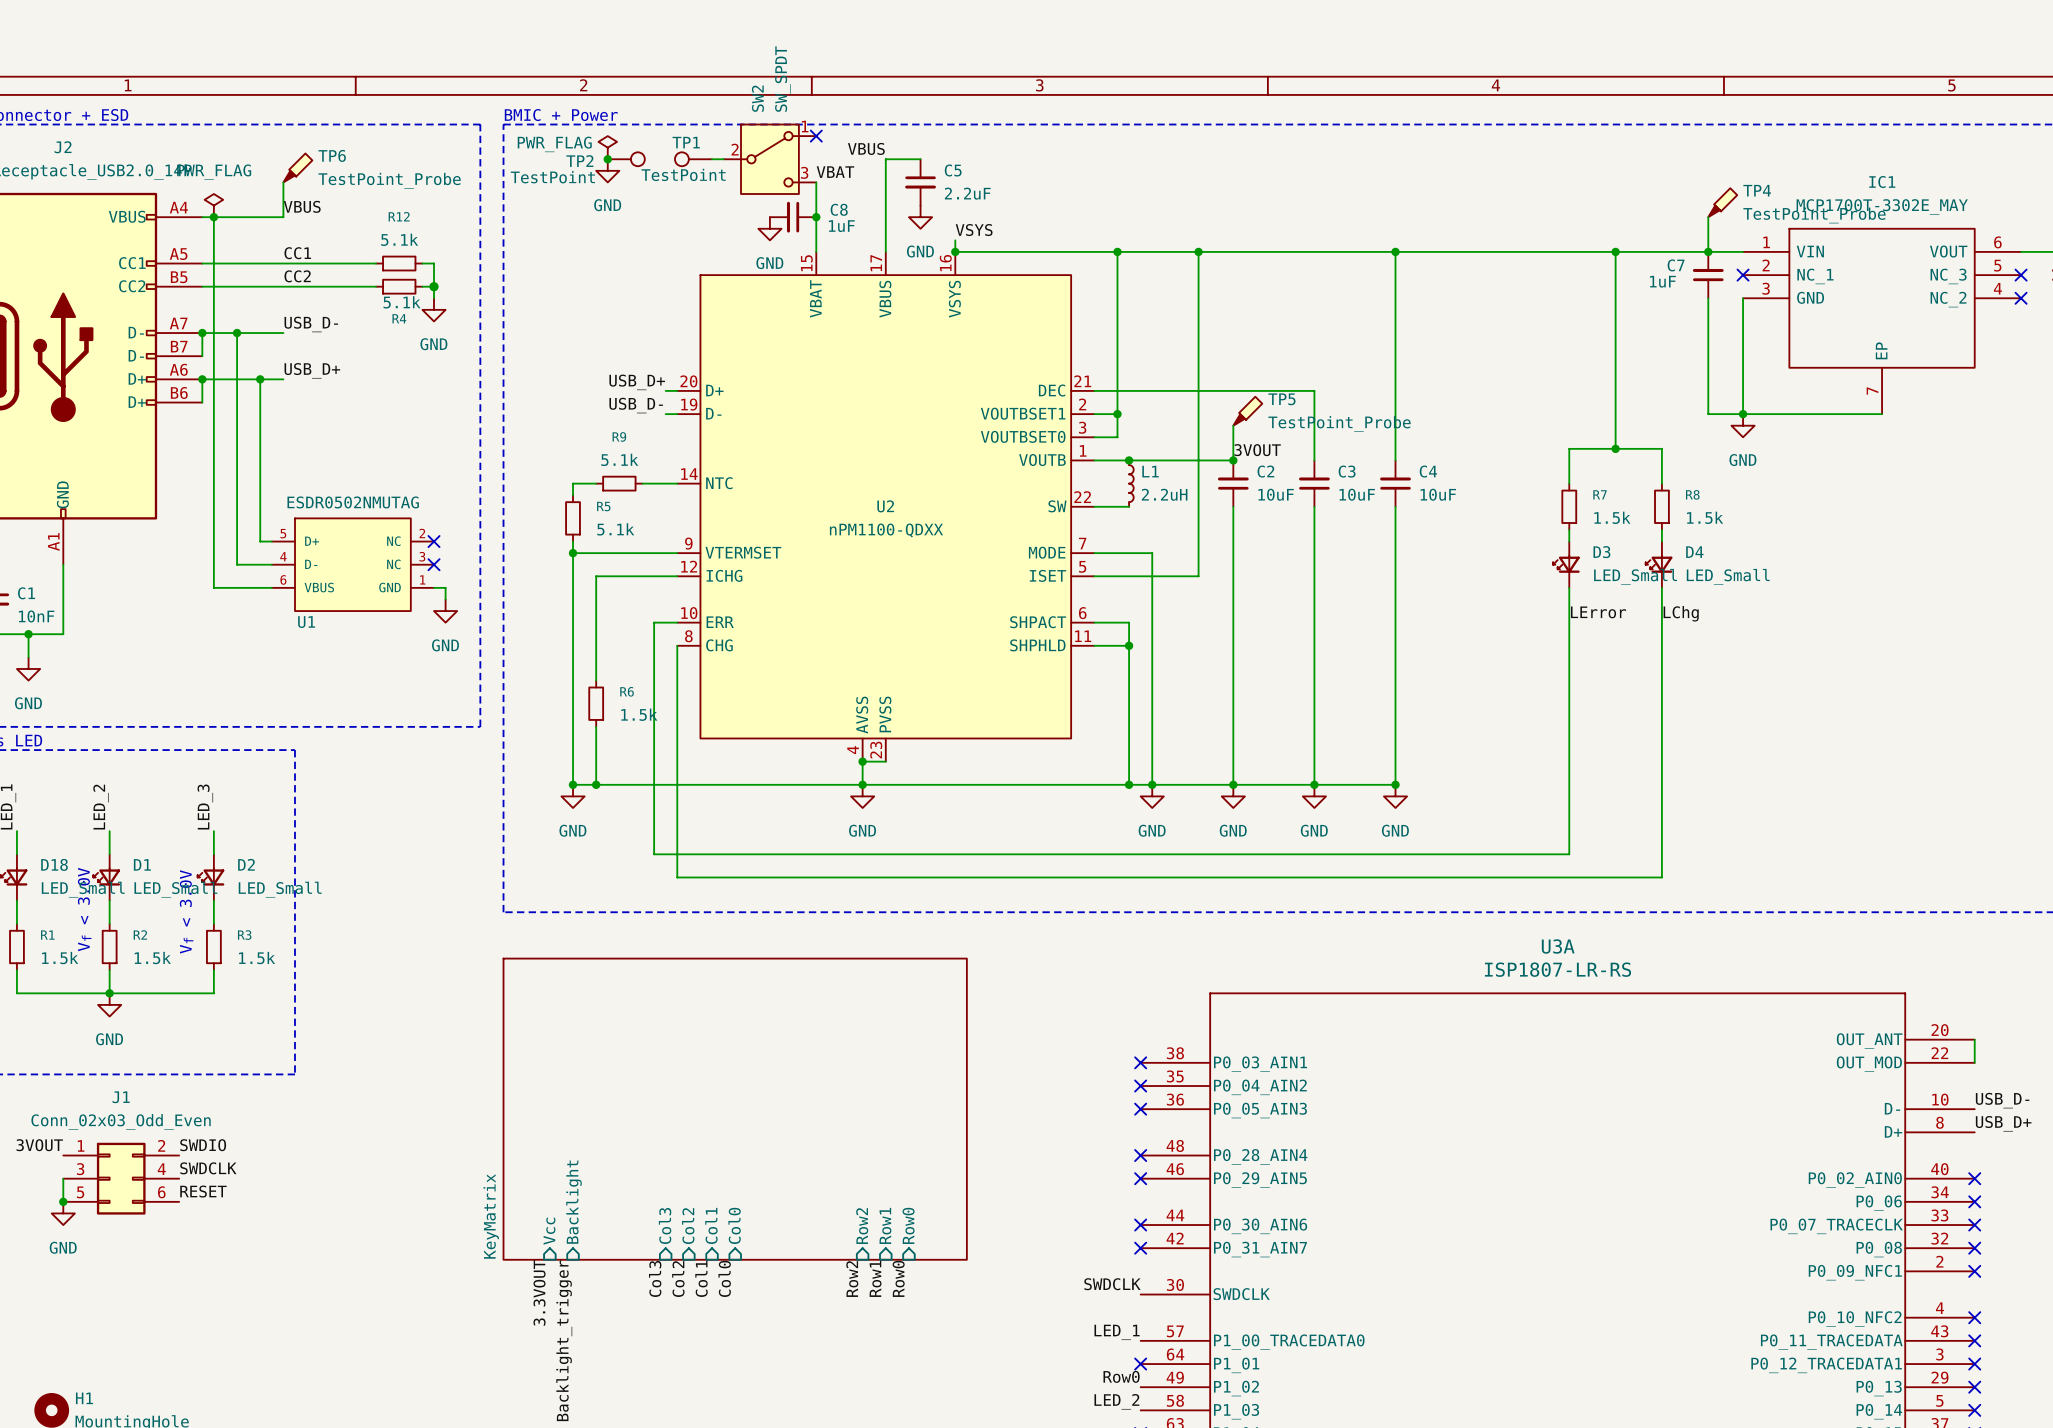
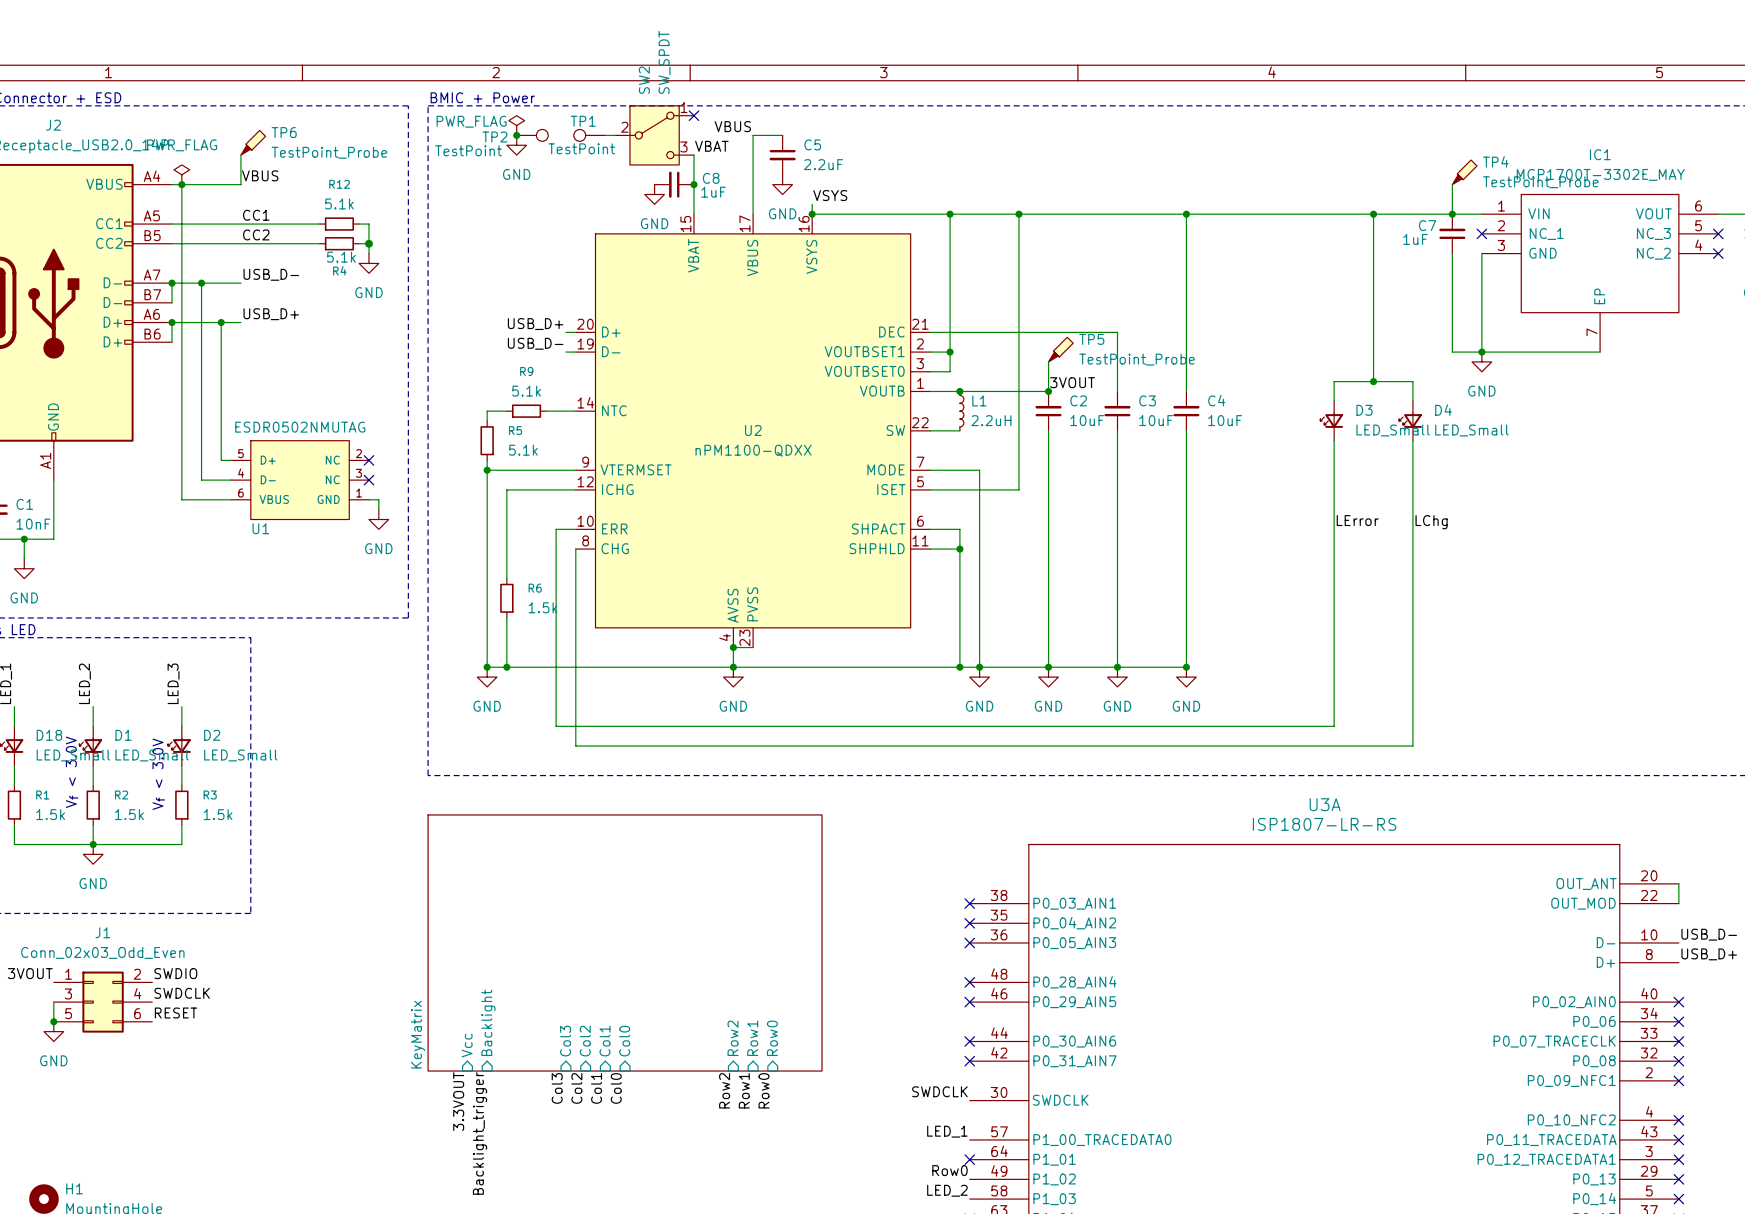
R7: 1.5k (1569, 506) -> none
R8: 1.5k (1661, 506) -> none
D3 position: (1566, 564) -> (1331, 421)
D4 position: (1659, 564) -> (1410, 421)

